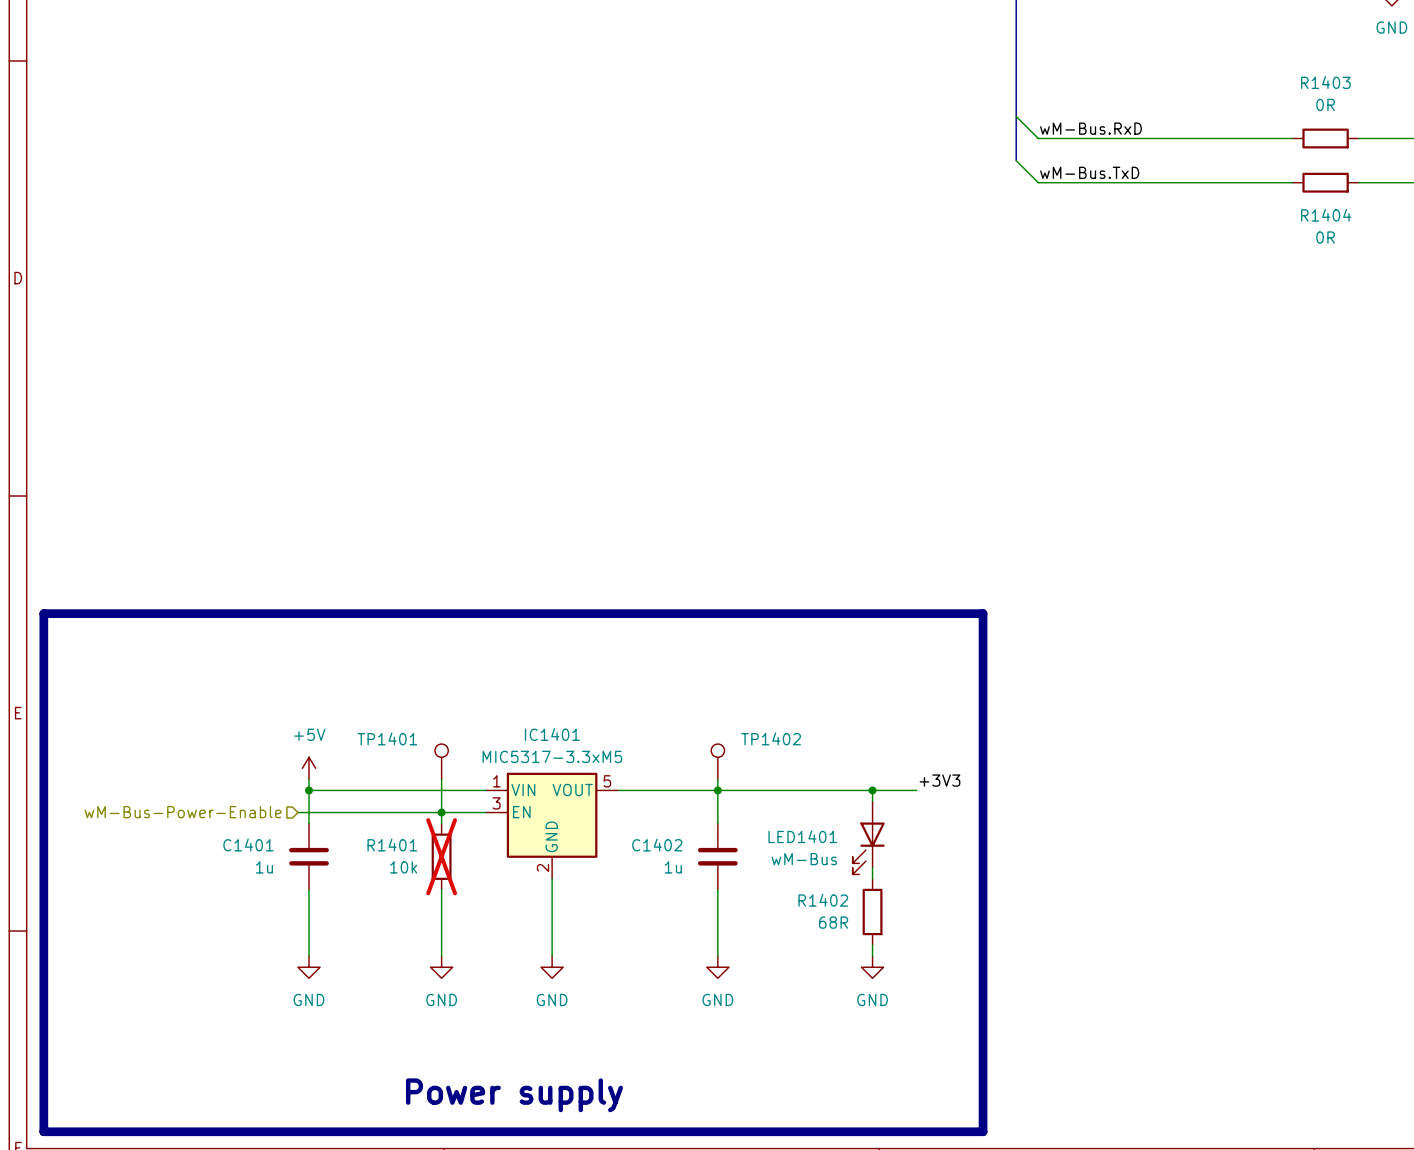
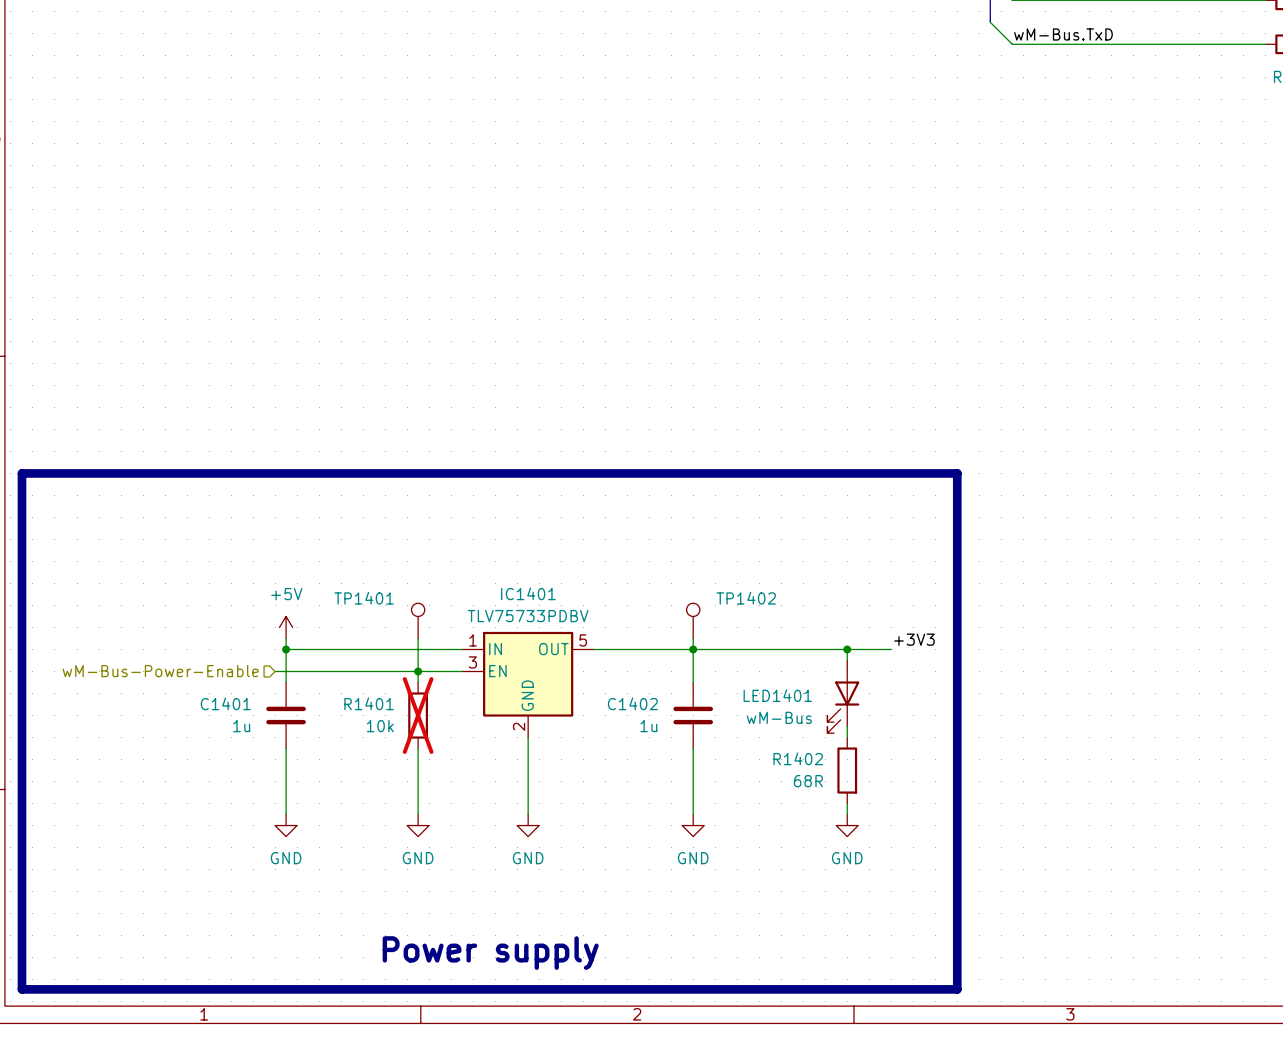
IC1401 value: MIC5317-3.3xM5 (552, 756) -> TLV75733PDBV (528, 616)
IC1401 pin name: VIN (523, 790) -> IN (495, 649)
IC1401 pin name: VOUT (572, 790) -> OUT (553, 649)

